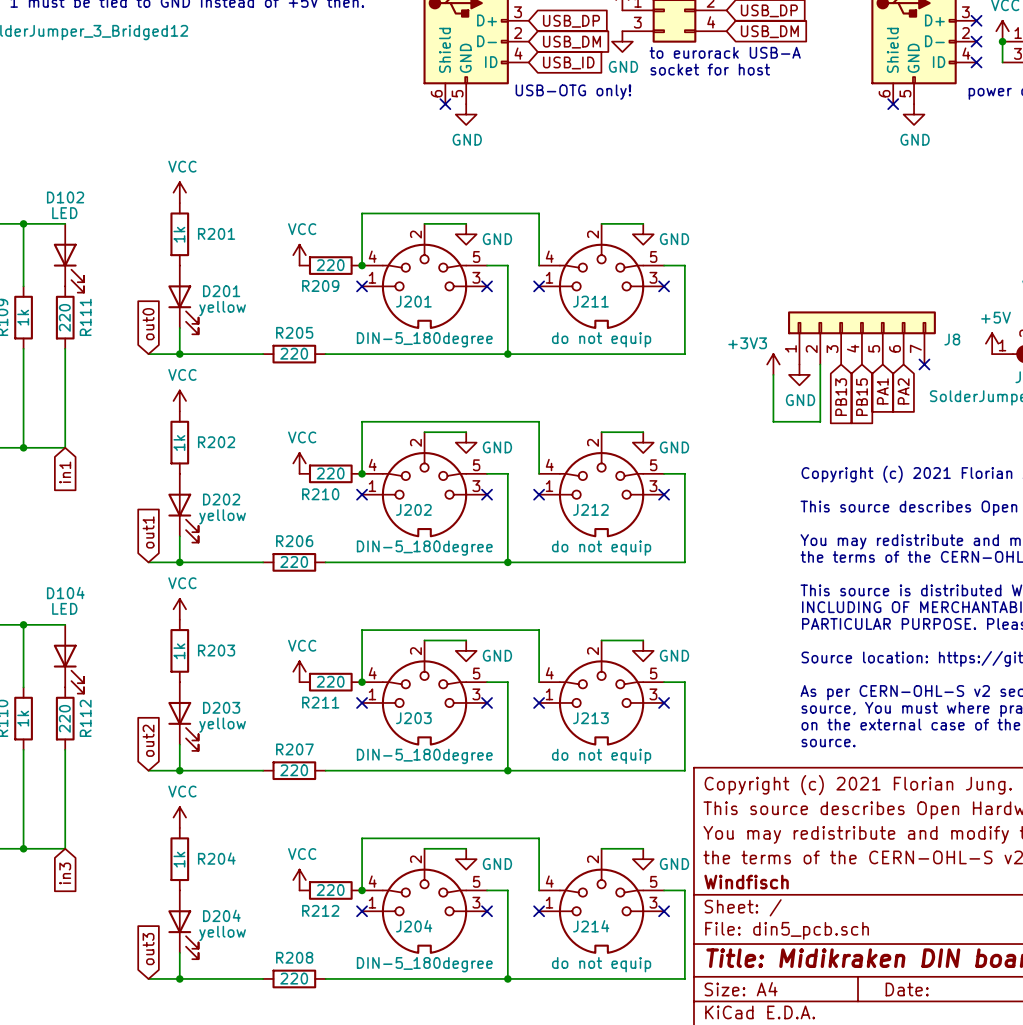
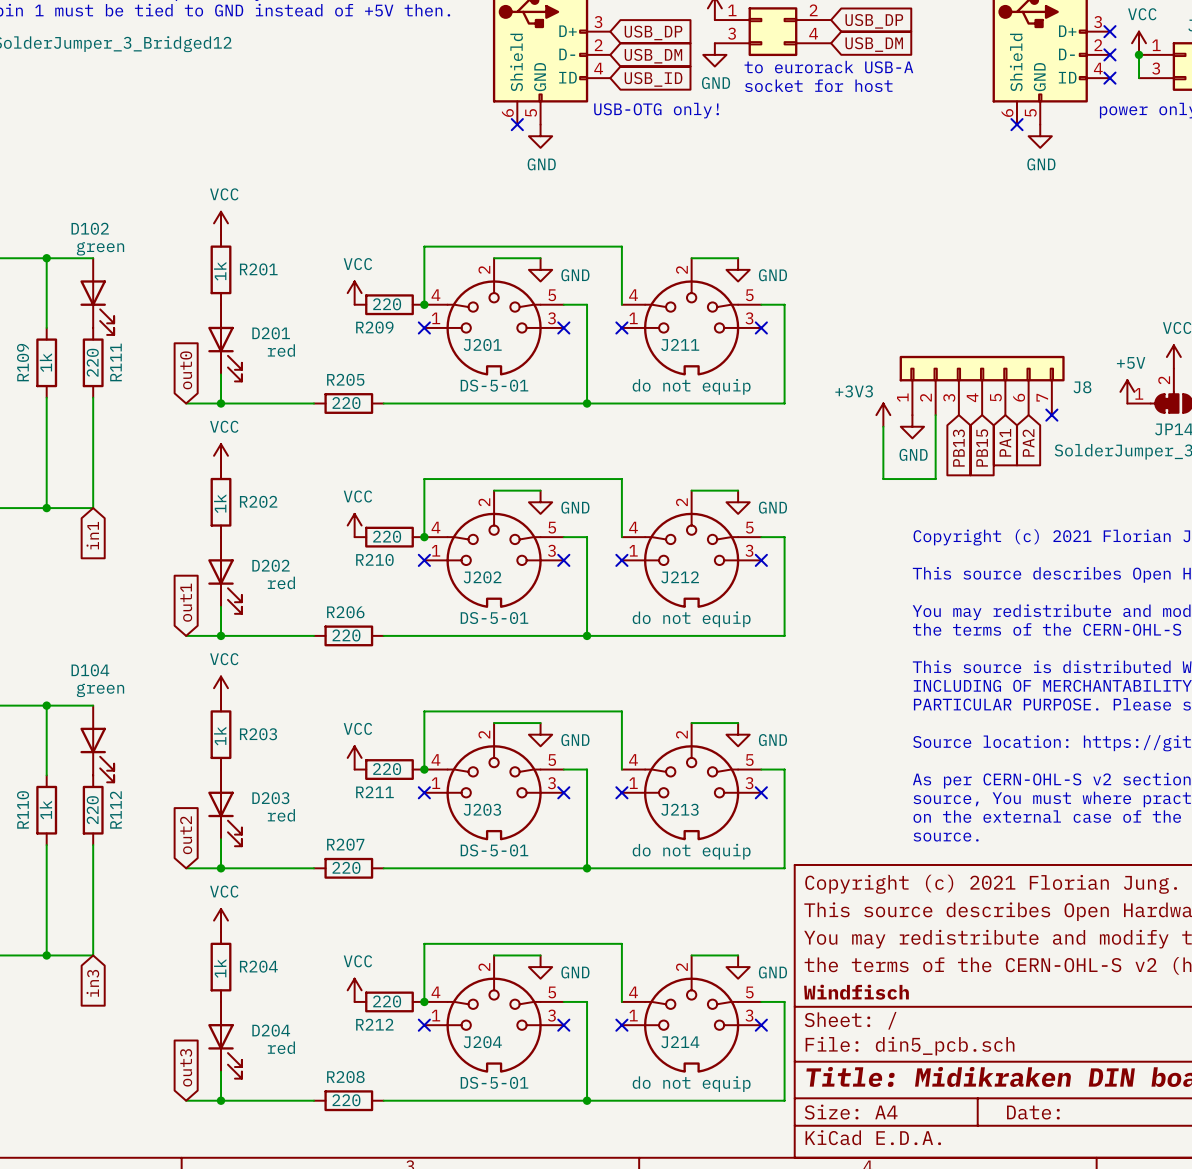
D102 value: LED (64, 213) -> green (100, 248)
D201 value: yellow (222, 308) -> red (281, 350)
J201 value: DIN-5_180degree (424, 339) -> DS-5-01 (494, 385)
D202 value: yellow (222, 516) -> red (281, 582)
J202 value: DIN-5_180degree (424, 548) -> DS-5-01 (494, 618)
D104 value: LED (64, 608) -> green (100, 690)
D203 value: yellow (222, 725) -> red (281, 815)
J203 value: DIN-5_180degree (424, 756) -> DS-5-01 (494, 850)
D204 value: yellow (222, 933) -> red (281, 1047)
J204 value: DIN-5_180degree (424, 964) -> DS-5-01 (494, 1082)

